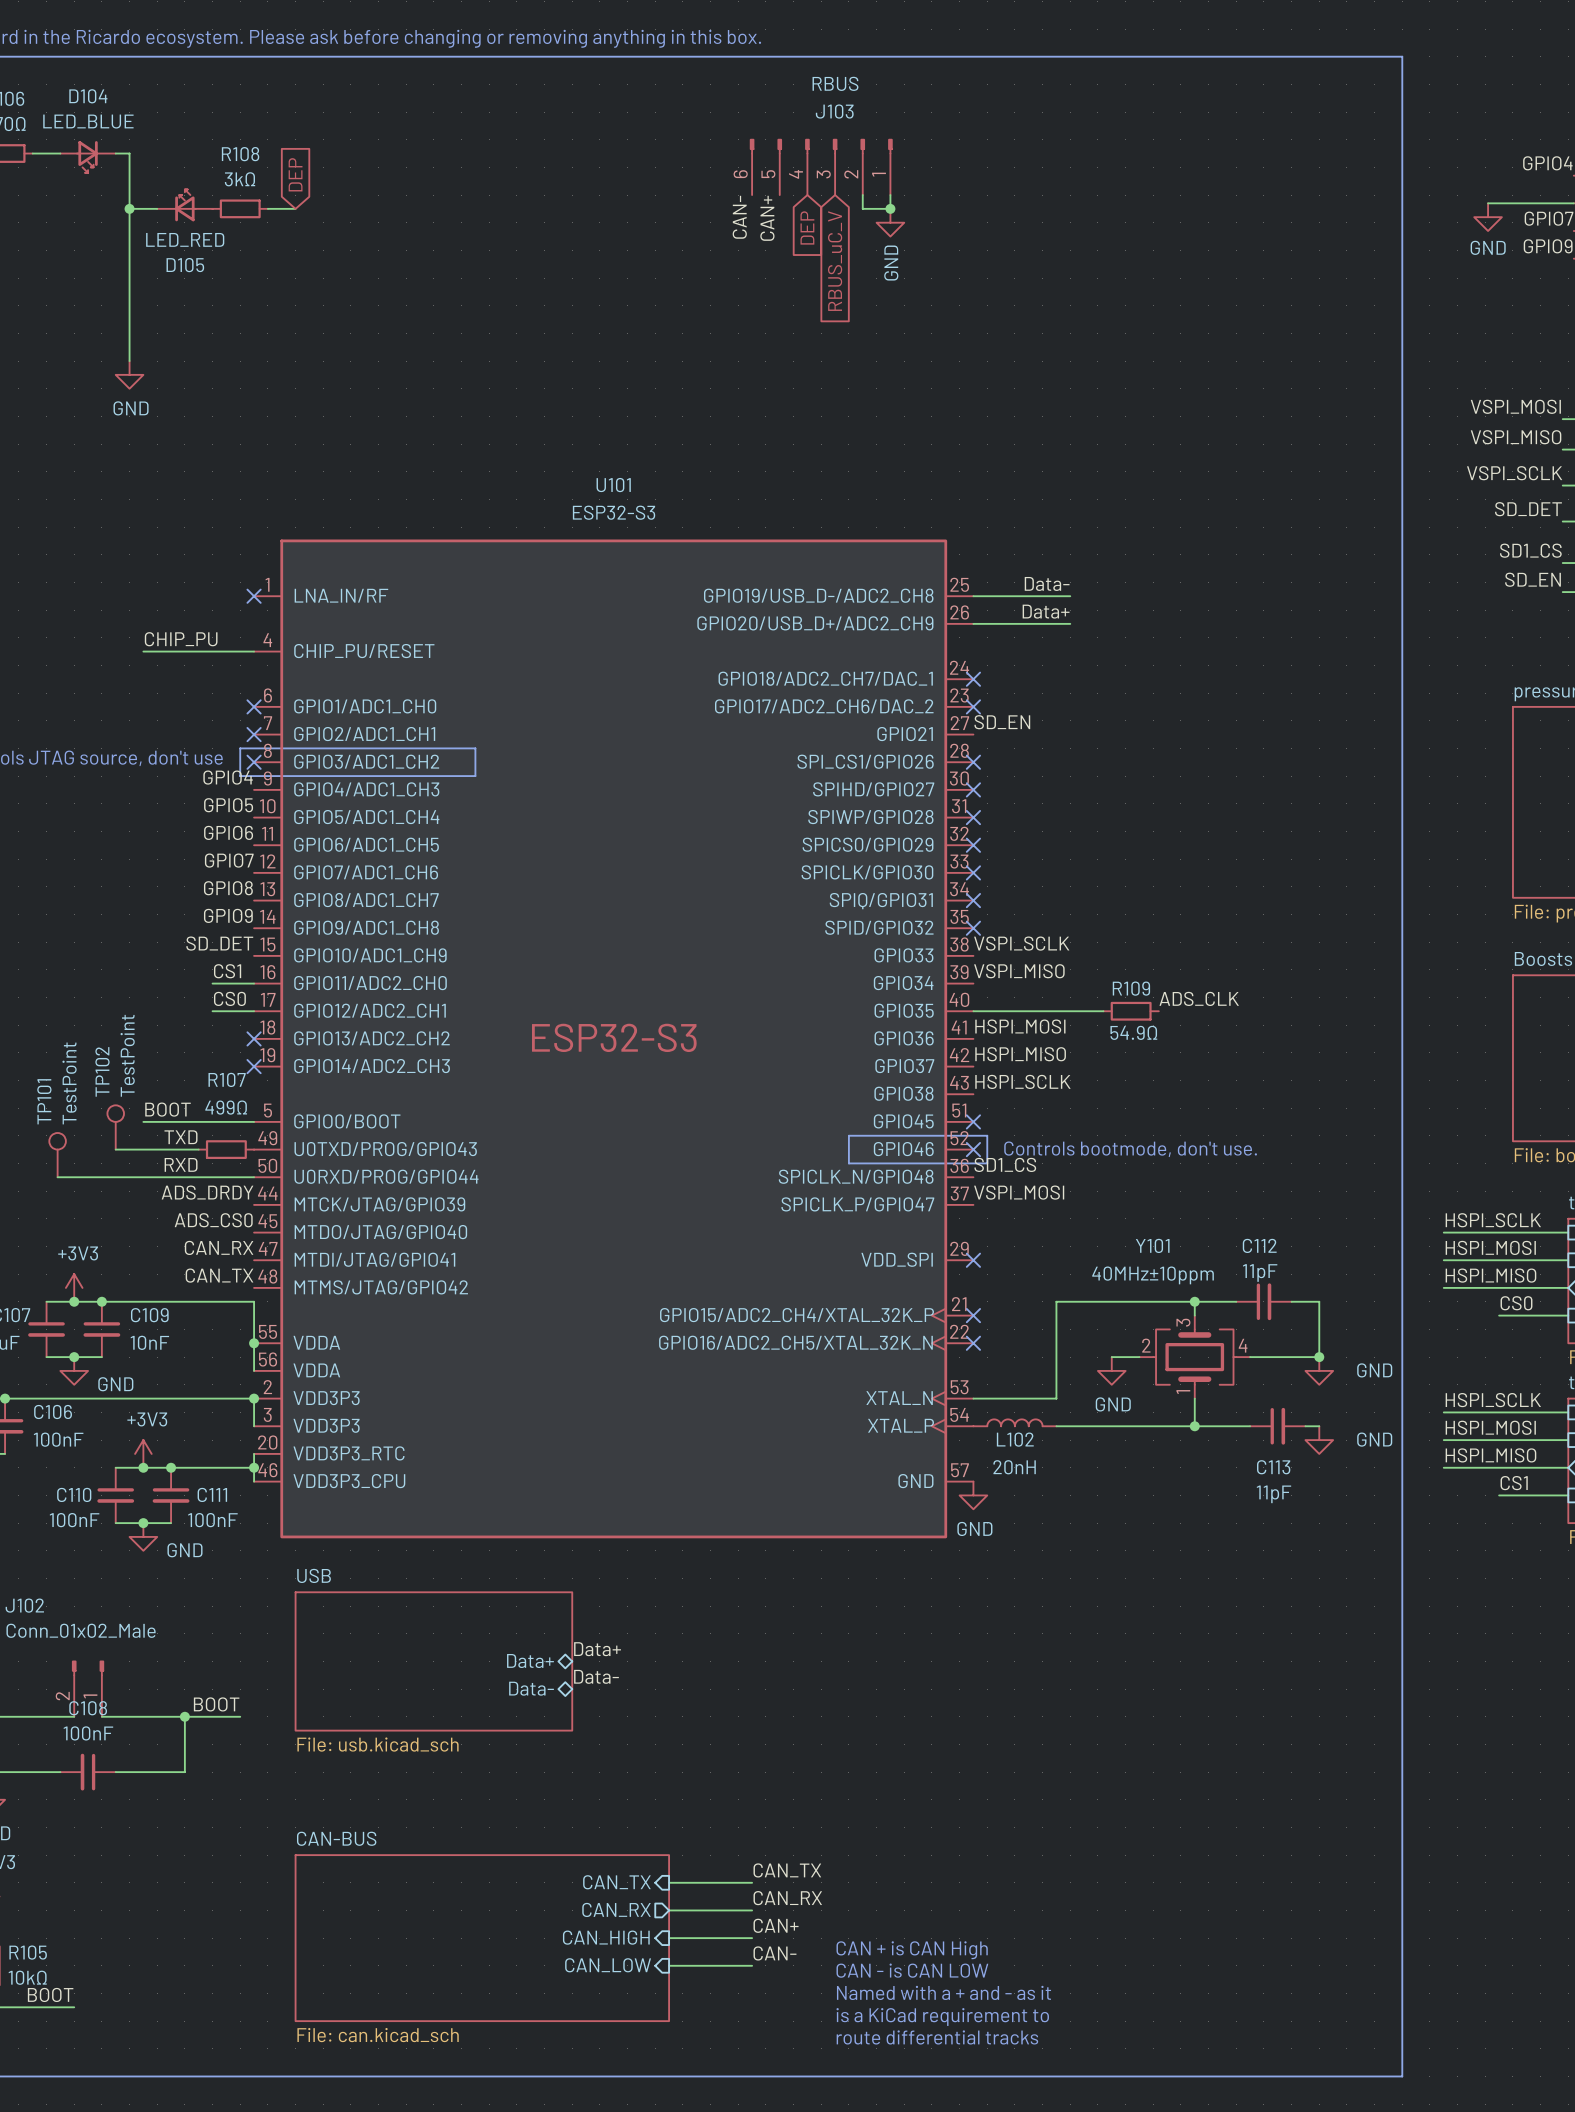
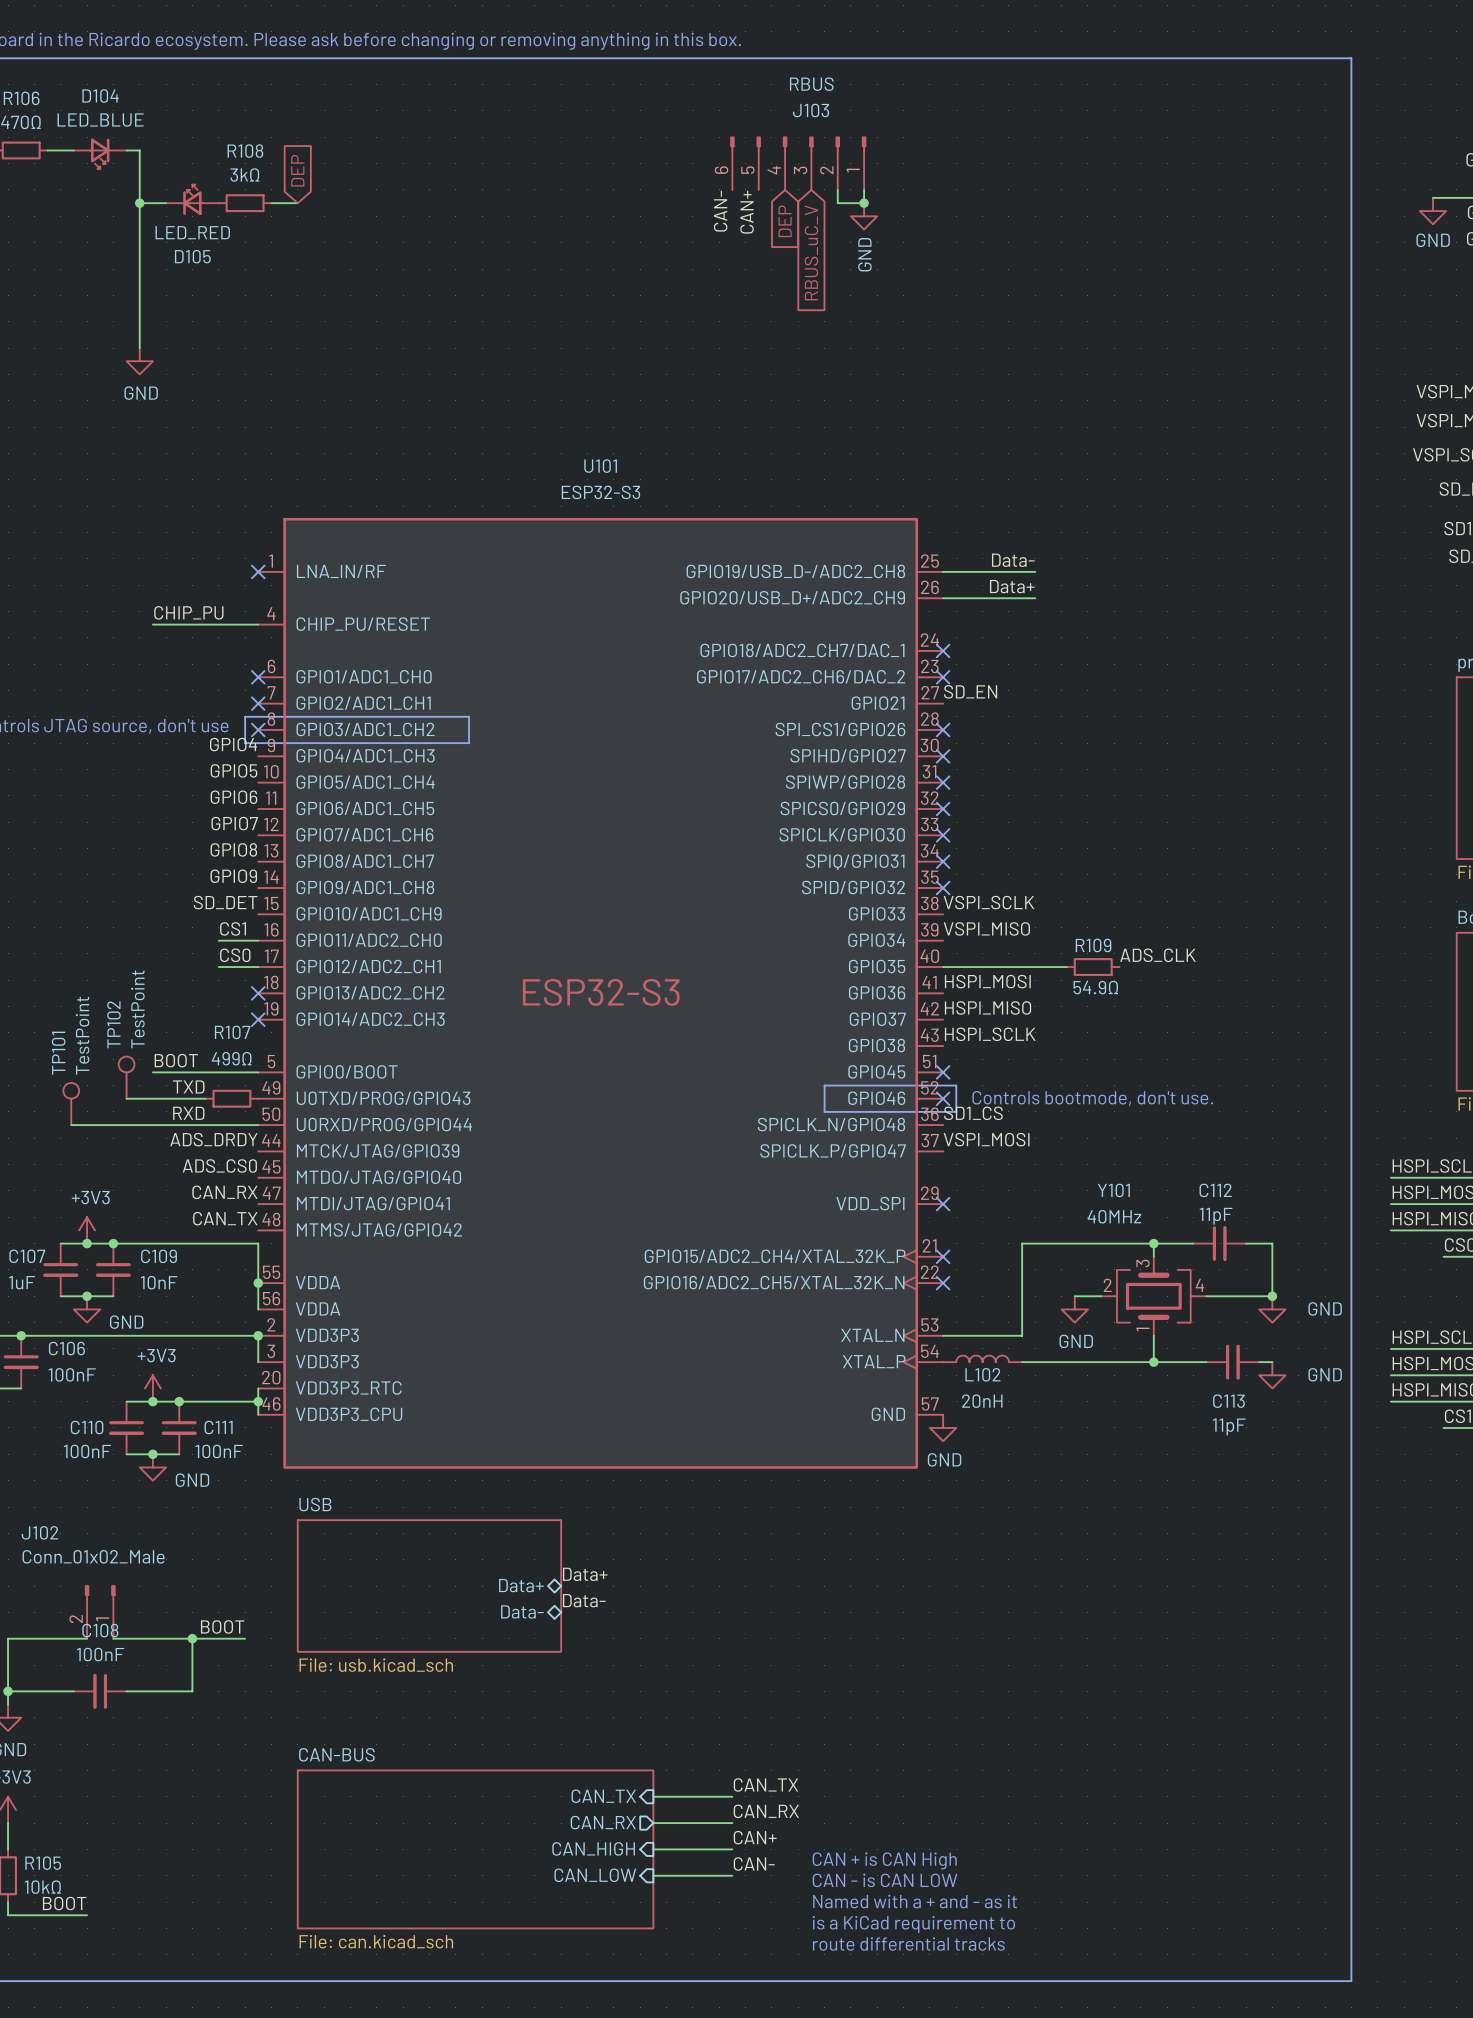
Y101 value: 40MHz±10ppm (1153, 1275) -> 40MHz (1114, 1216)

